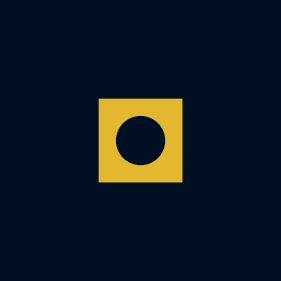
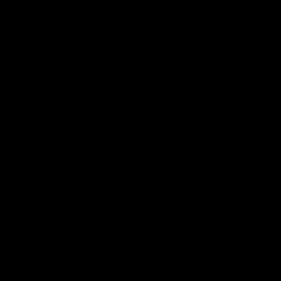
part: (140, 140) -> none

